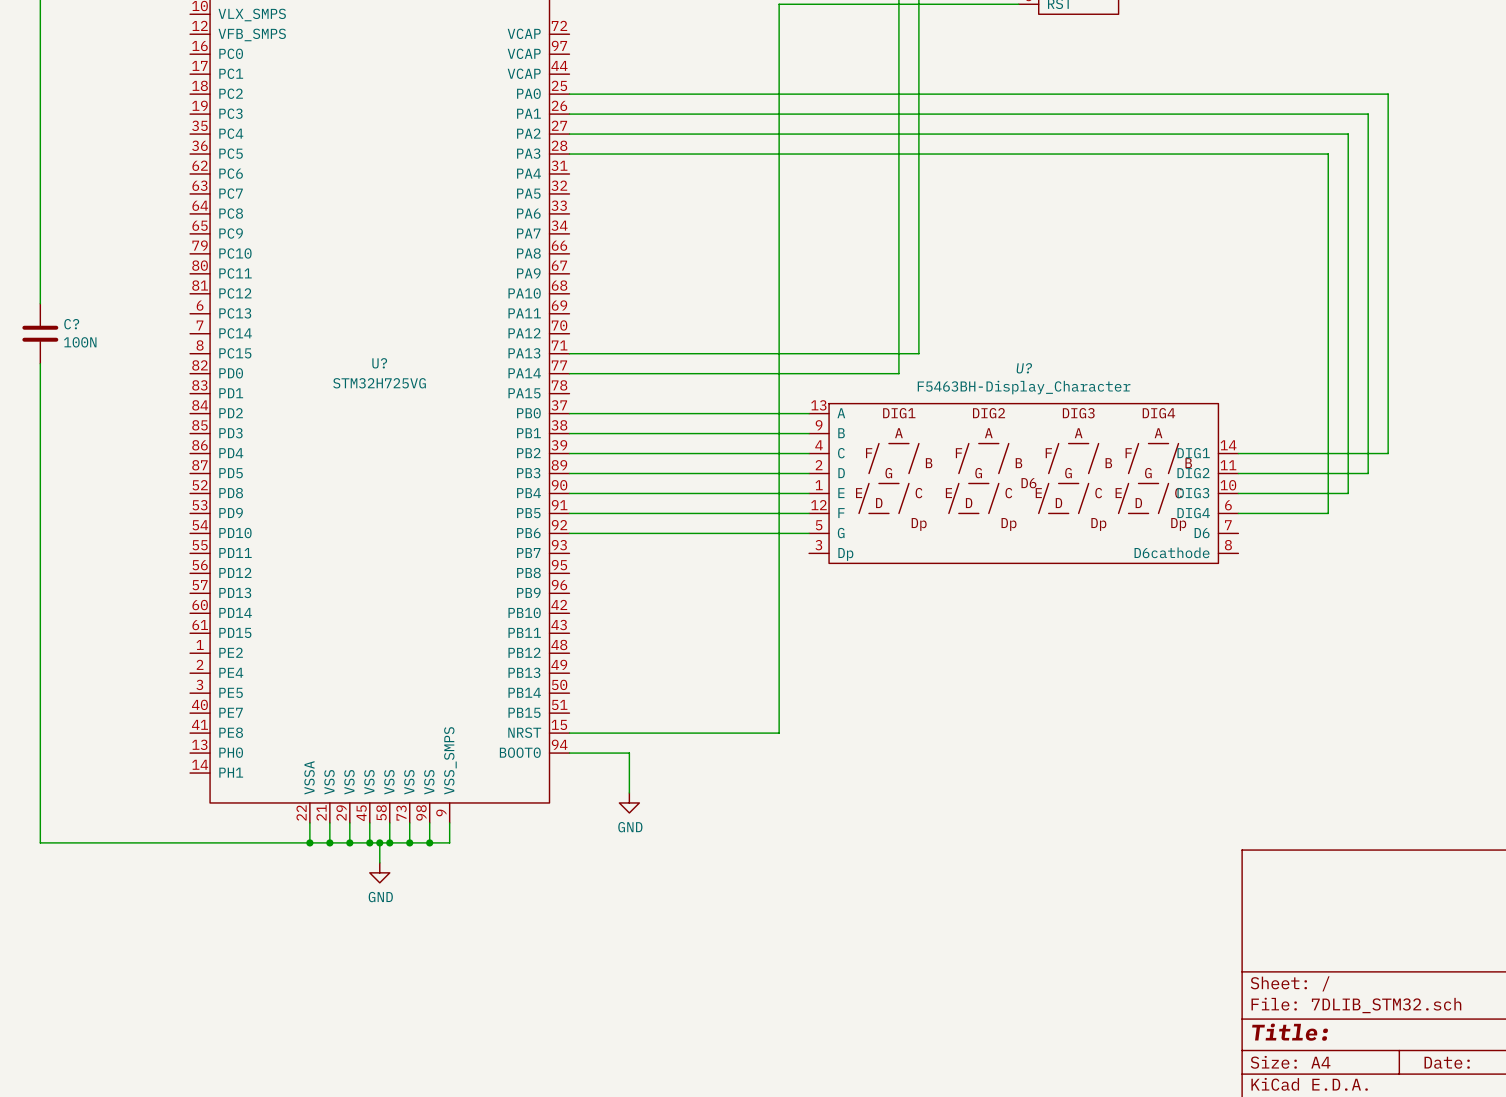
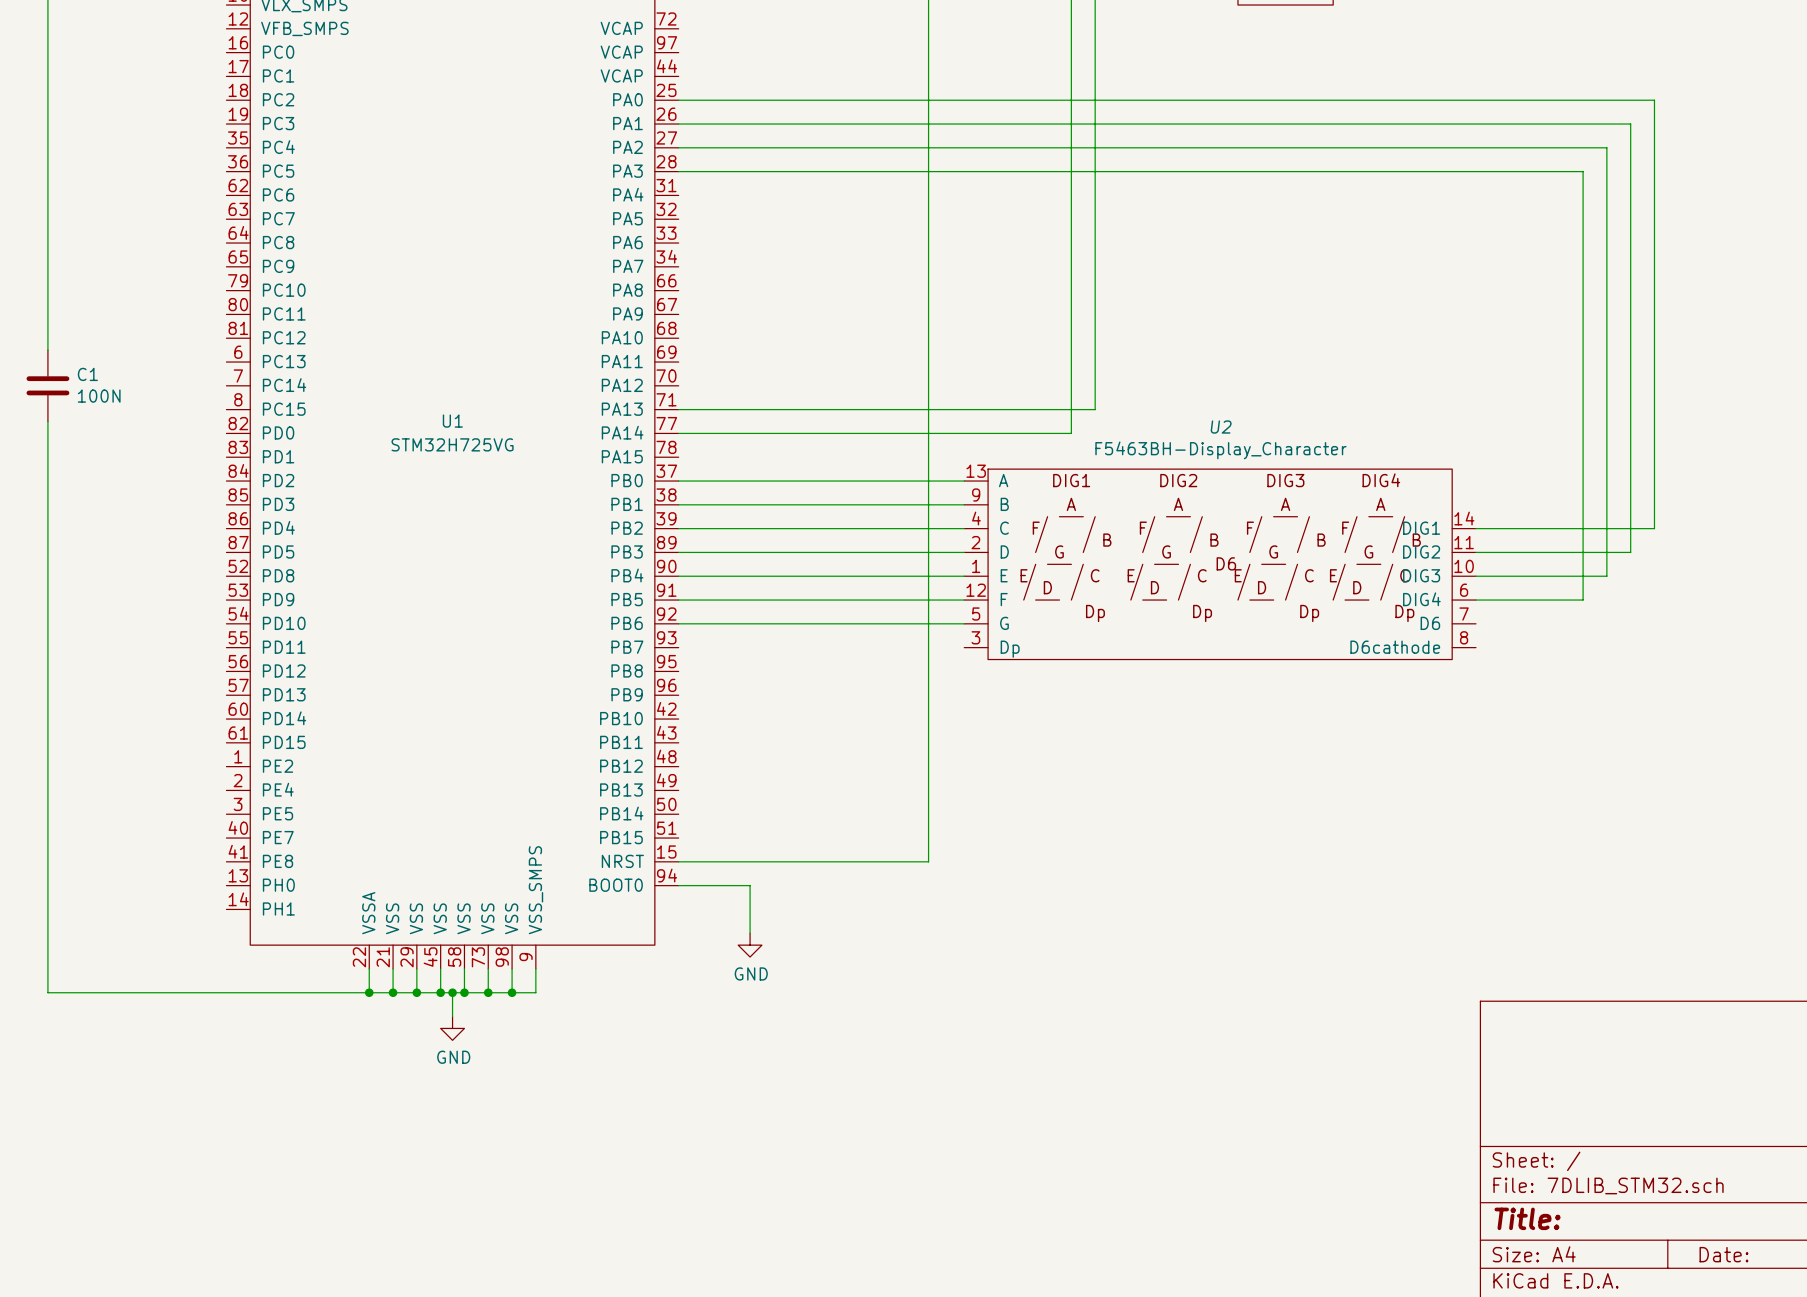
C? name: C? (71, 324) -> C1 (87, 374)
U? name: U? (379, 363) -> U1 (452, 421)
U? name: U? (1024, 368) -> U2 (1221, 427)

